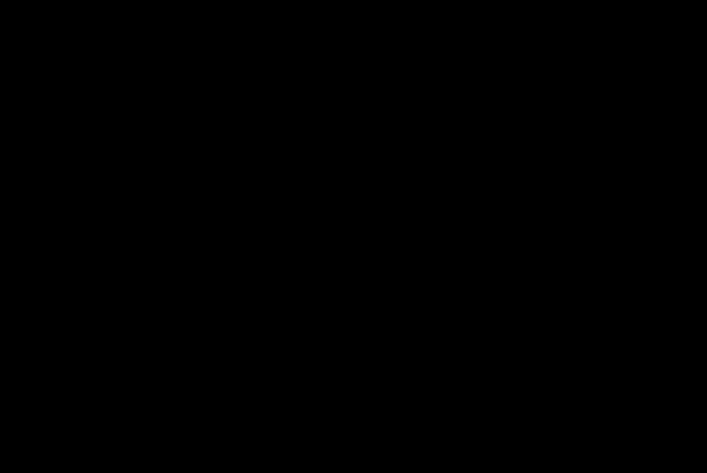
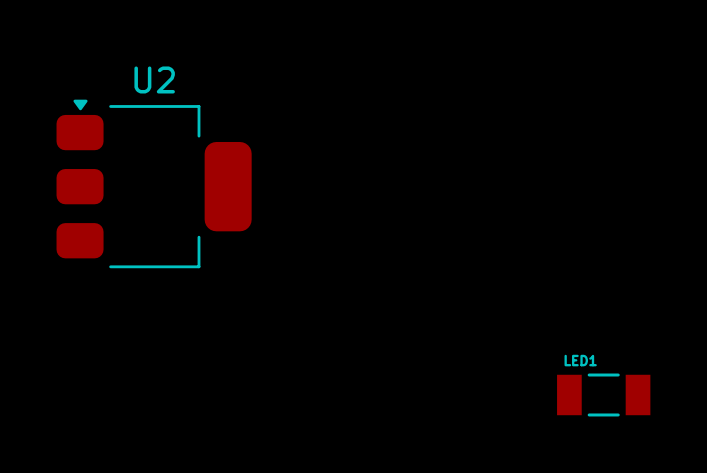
U2: none -> (154, 183)
LED1: none -> (603, 394)

